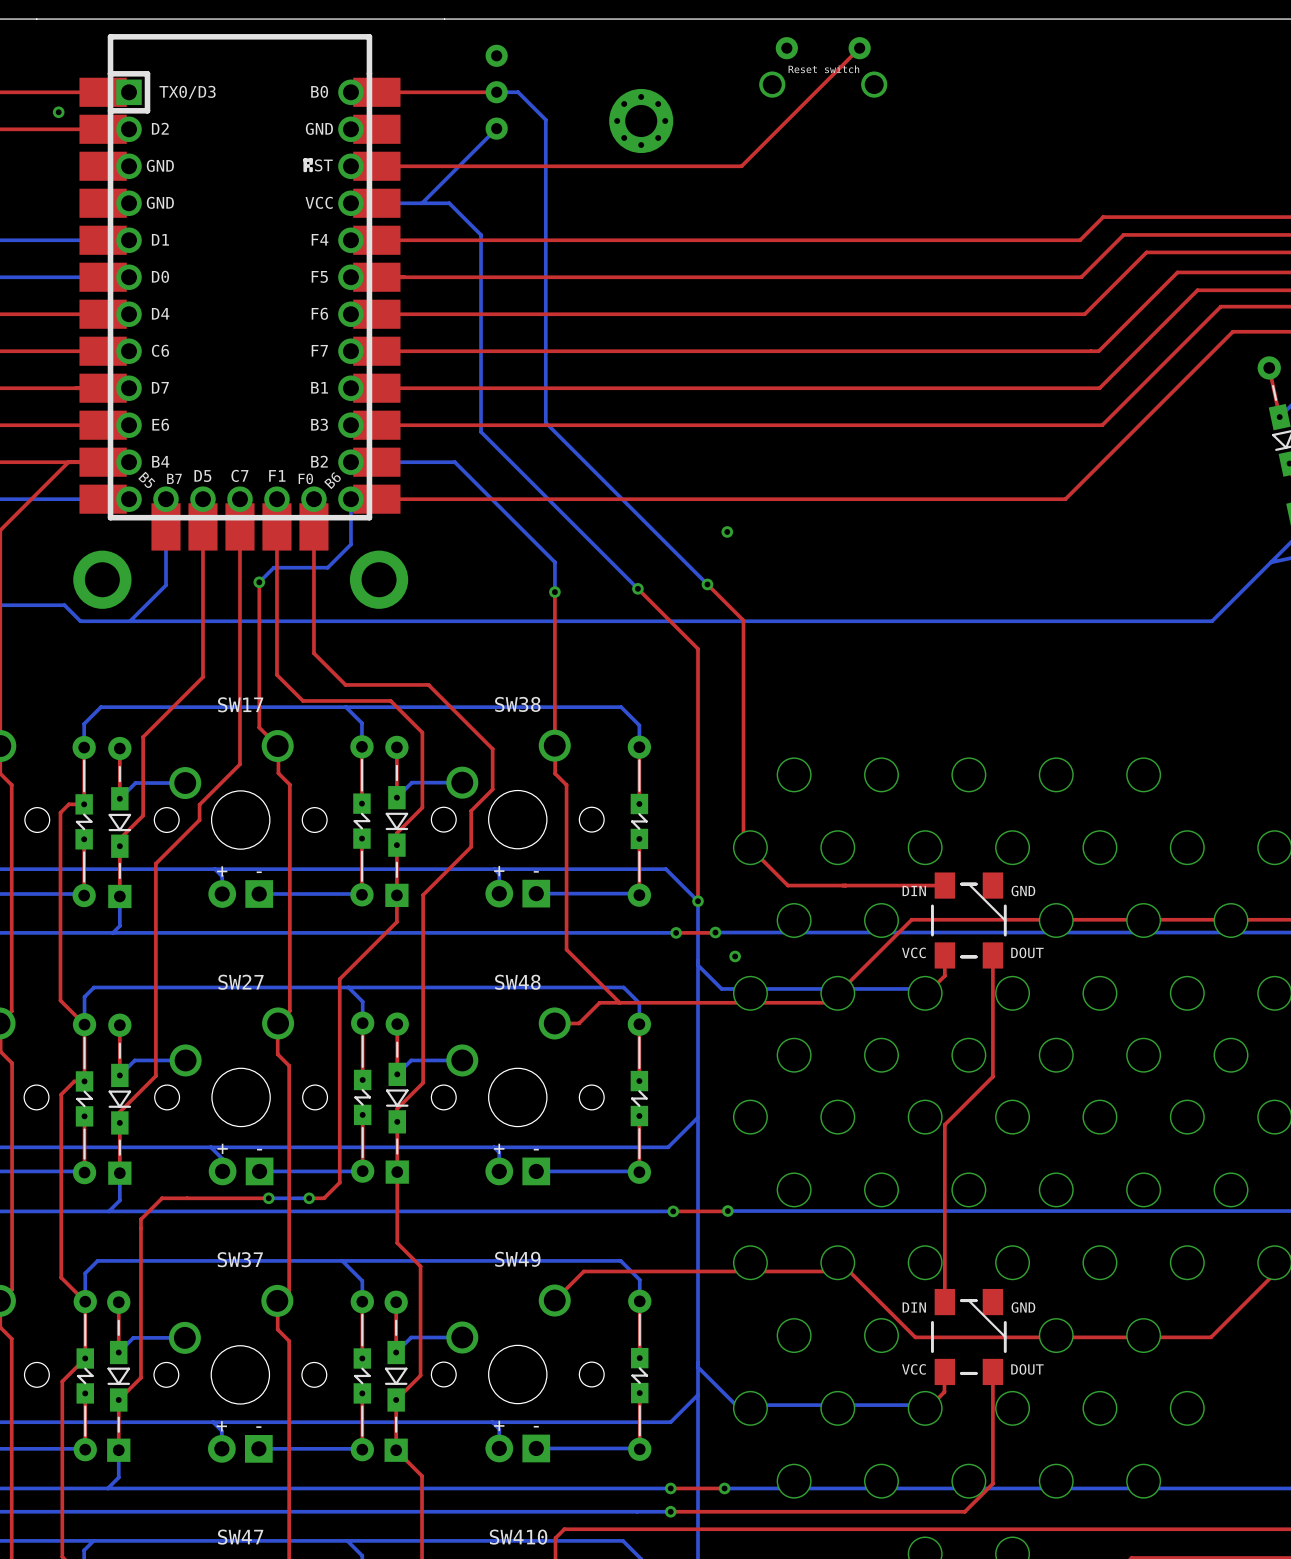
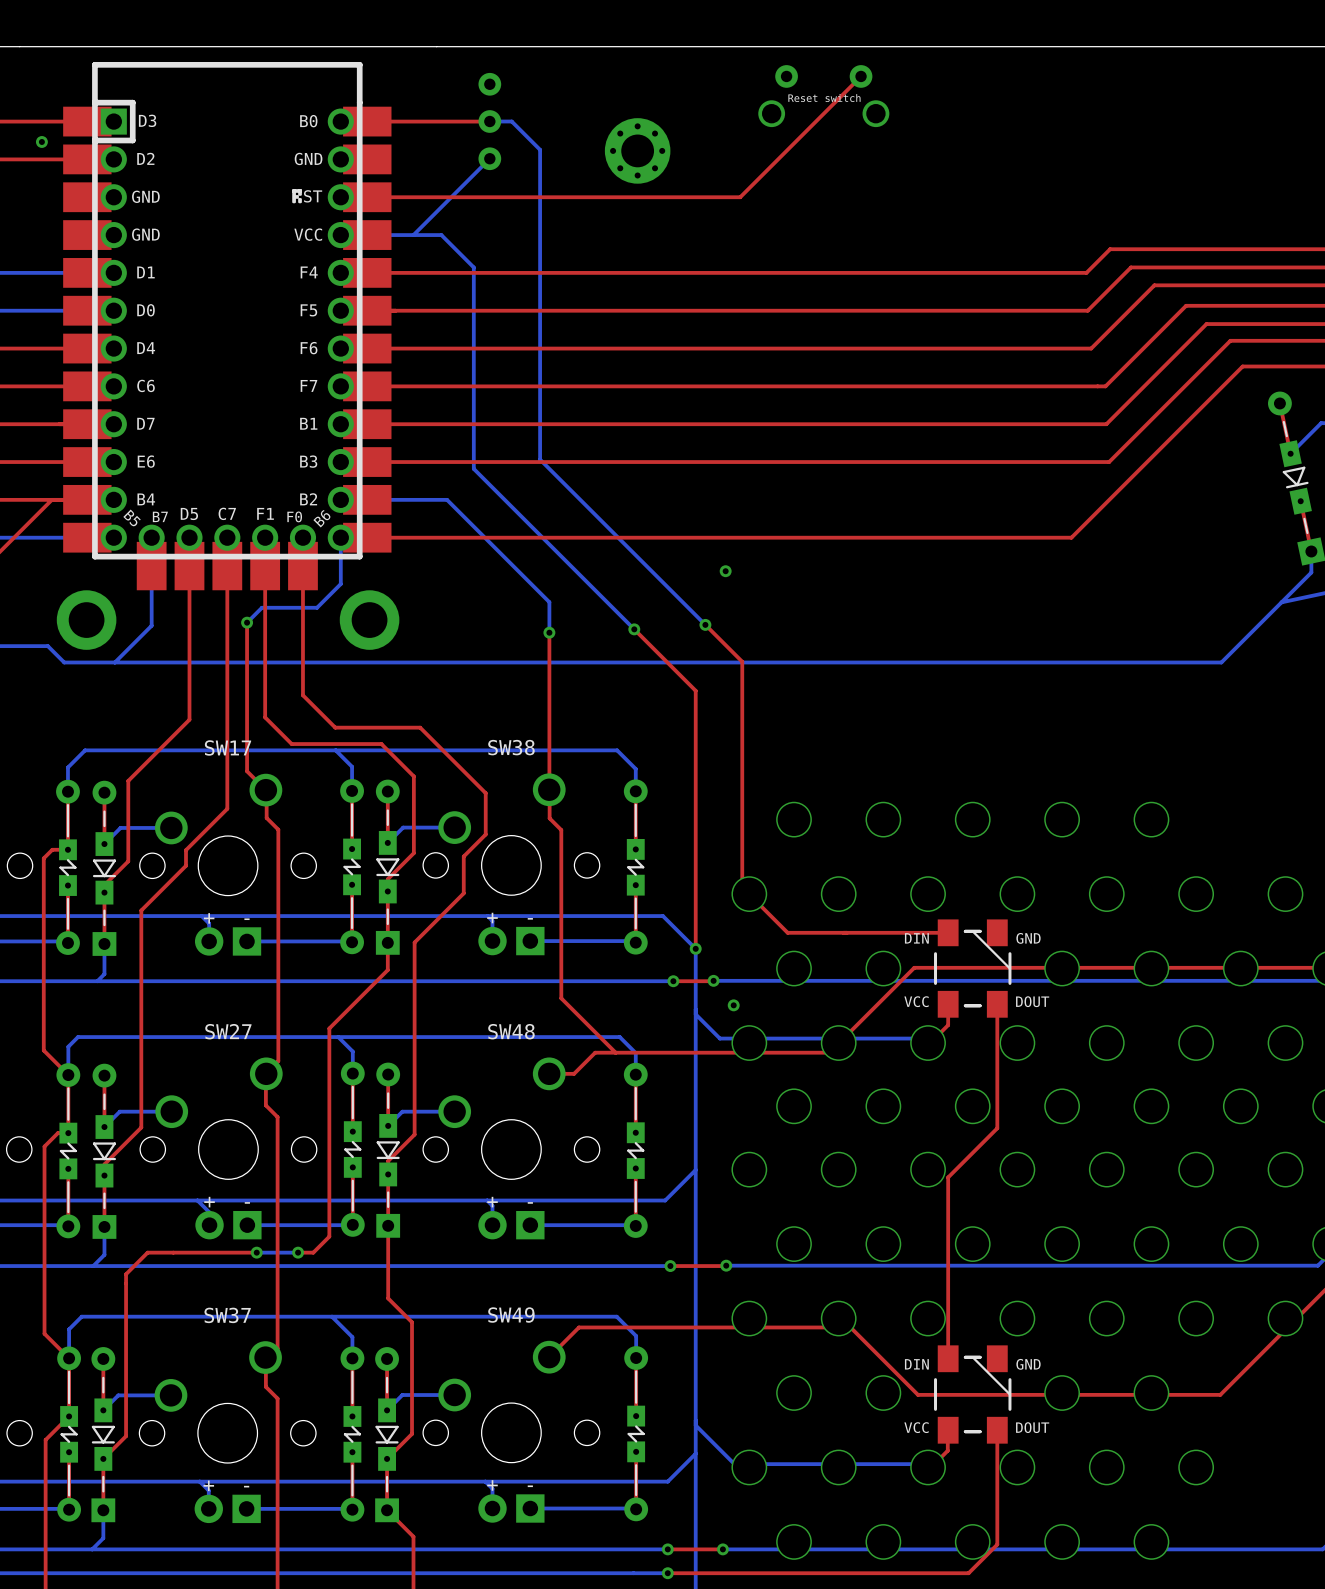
part text: none -> D3 (147, 120)
part text: TX0/D3 (187, 92) -> none

